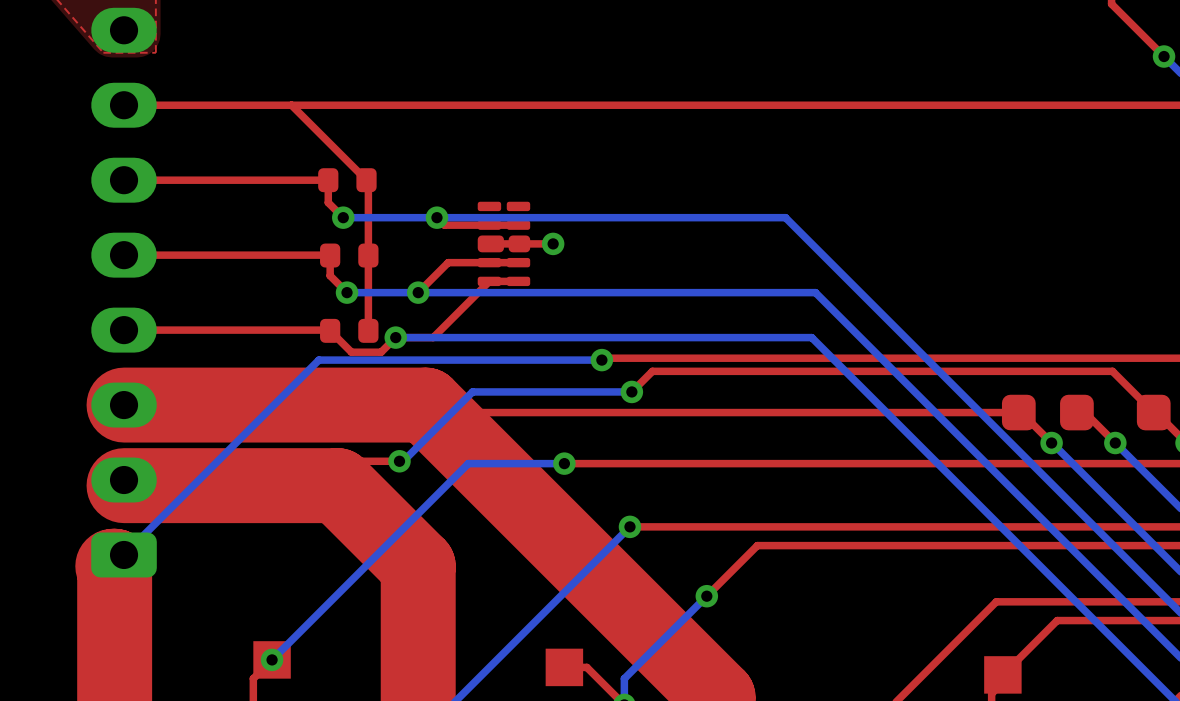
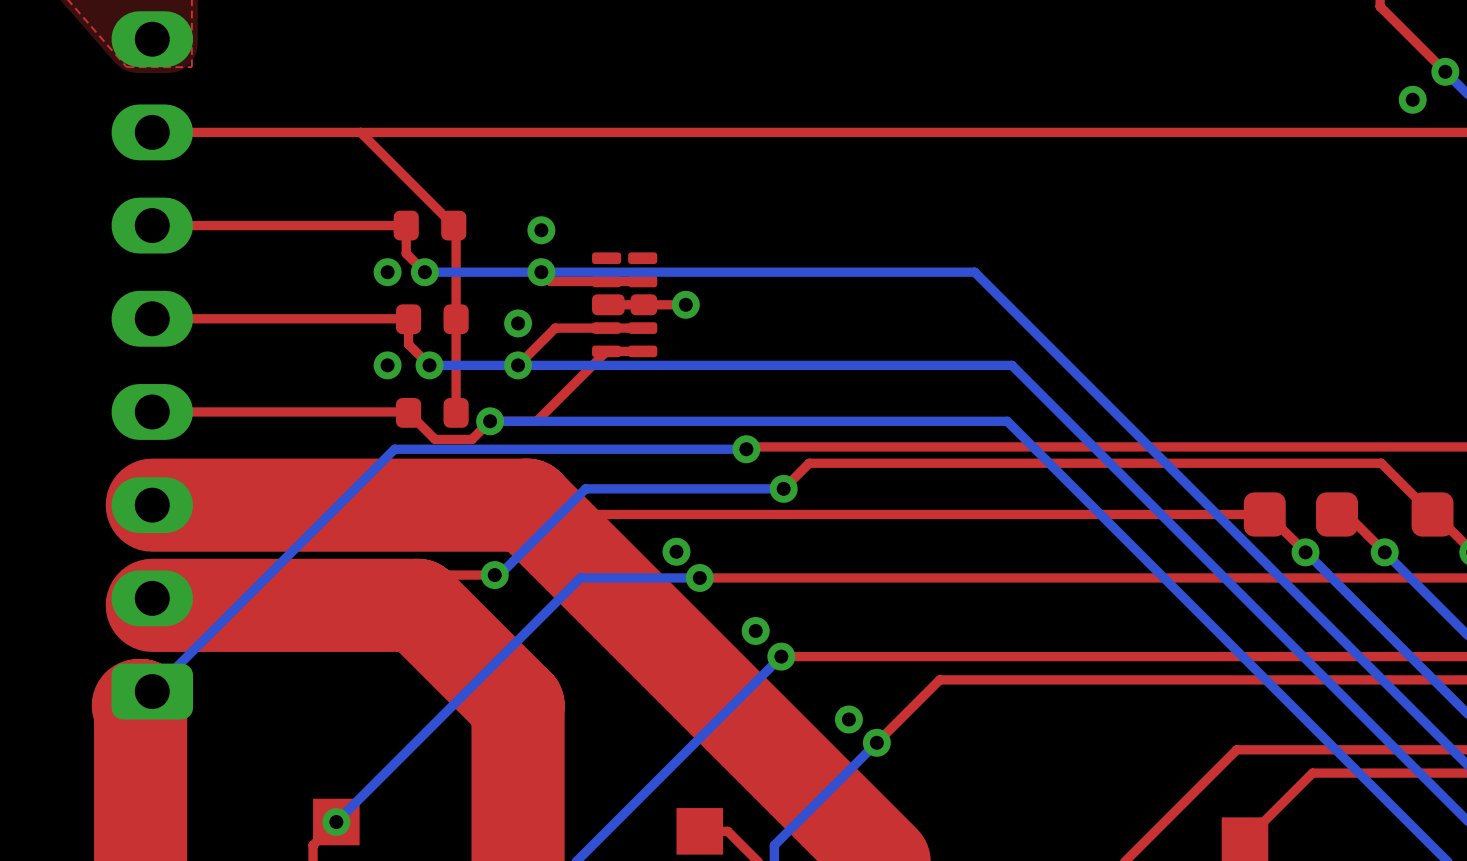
via: none -> (1412, 99)
via: none -> (541, 230)
via: none -> (387, 272)
via: none -> (518, 323)
via: none -> (387, 365)
via: none -> (676, 551)
via: none -> (755, 630)
via: none -> (848, 719)

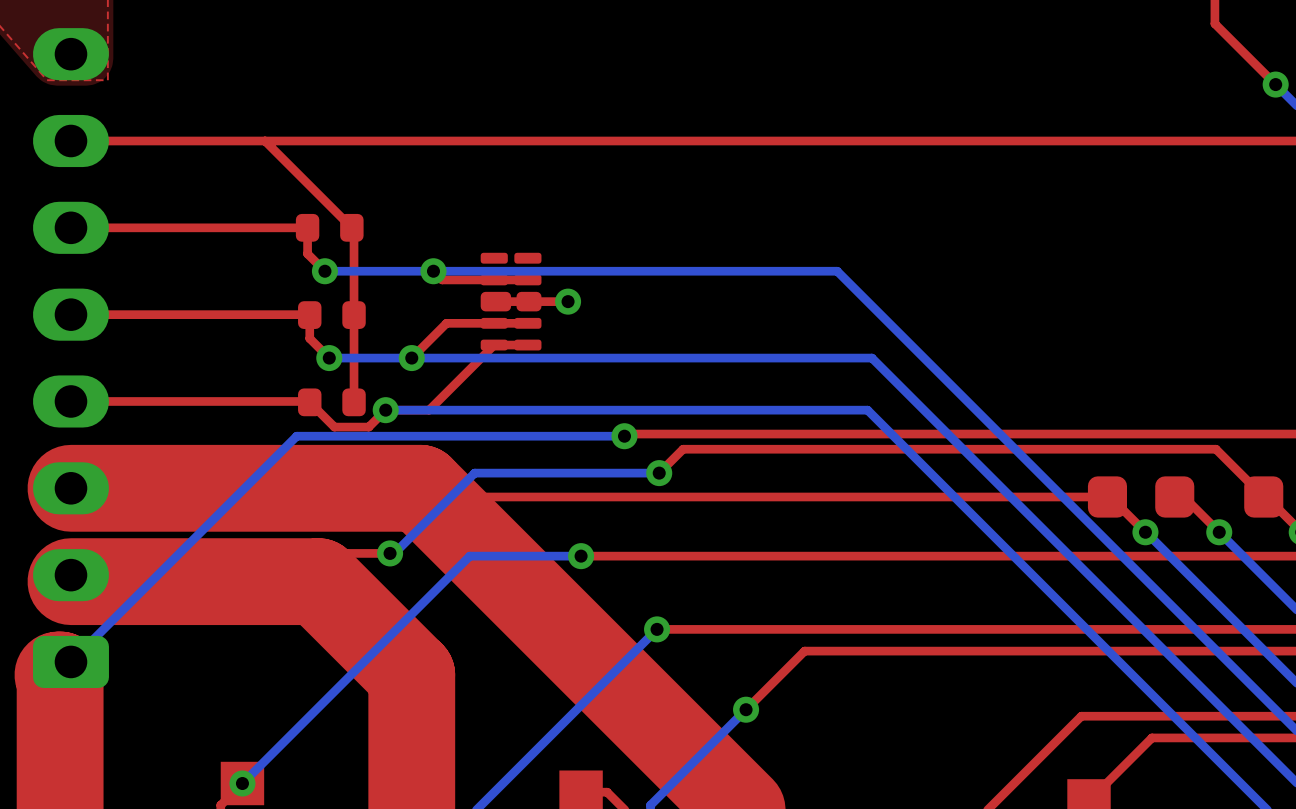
via: (1412, 99) -> none
via: (541, 230) -> none
via: (387, 272) -> none
via: (518, 323) -> none
via: (387, 365) -> none
via: (676, 551) -> none
via: (755, 630) -> none
via: (848, 719) -> none

